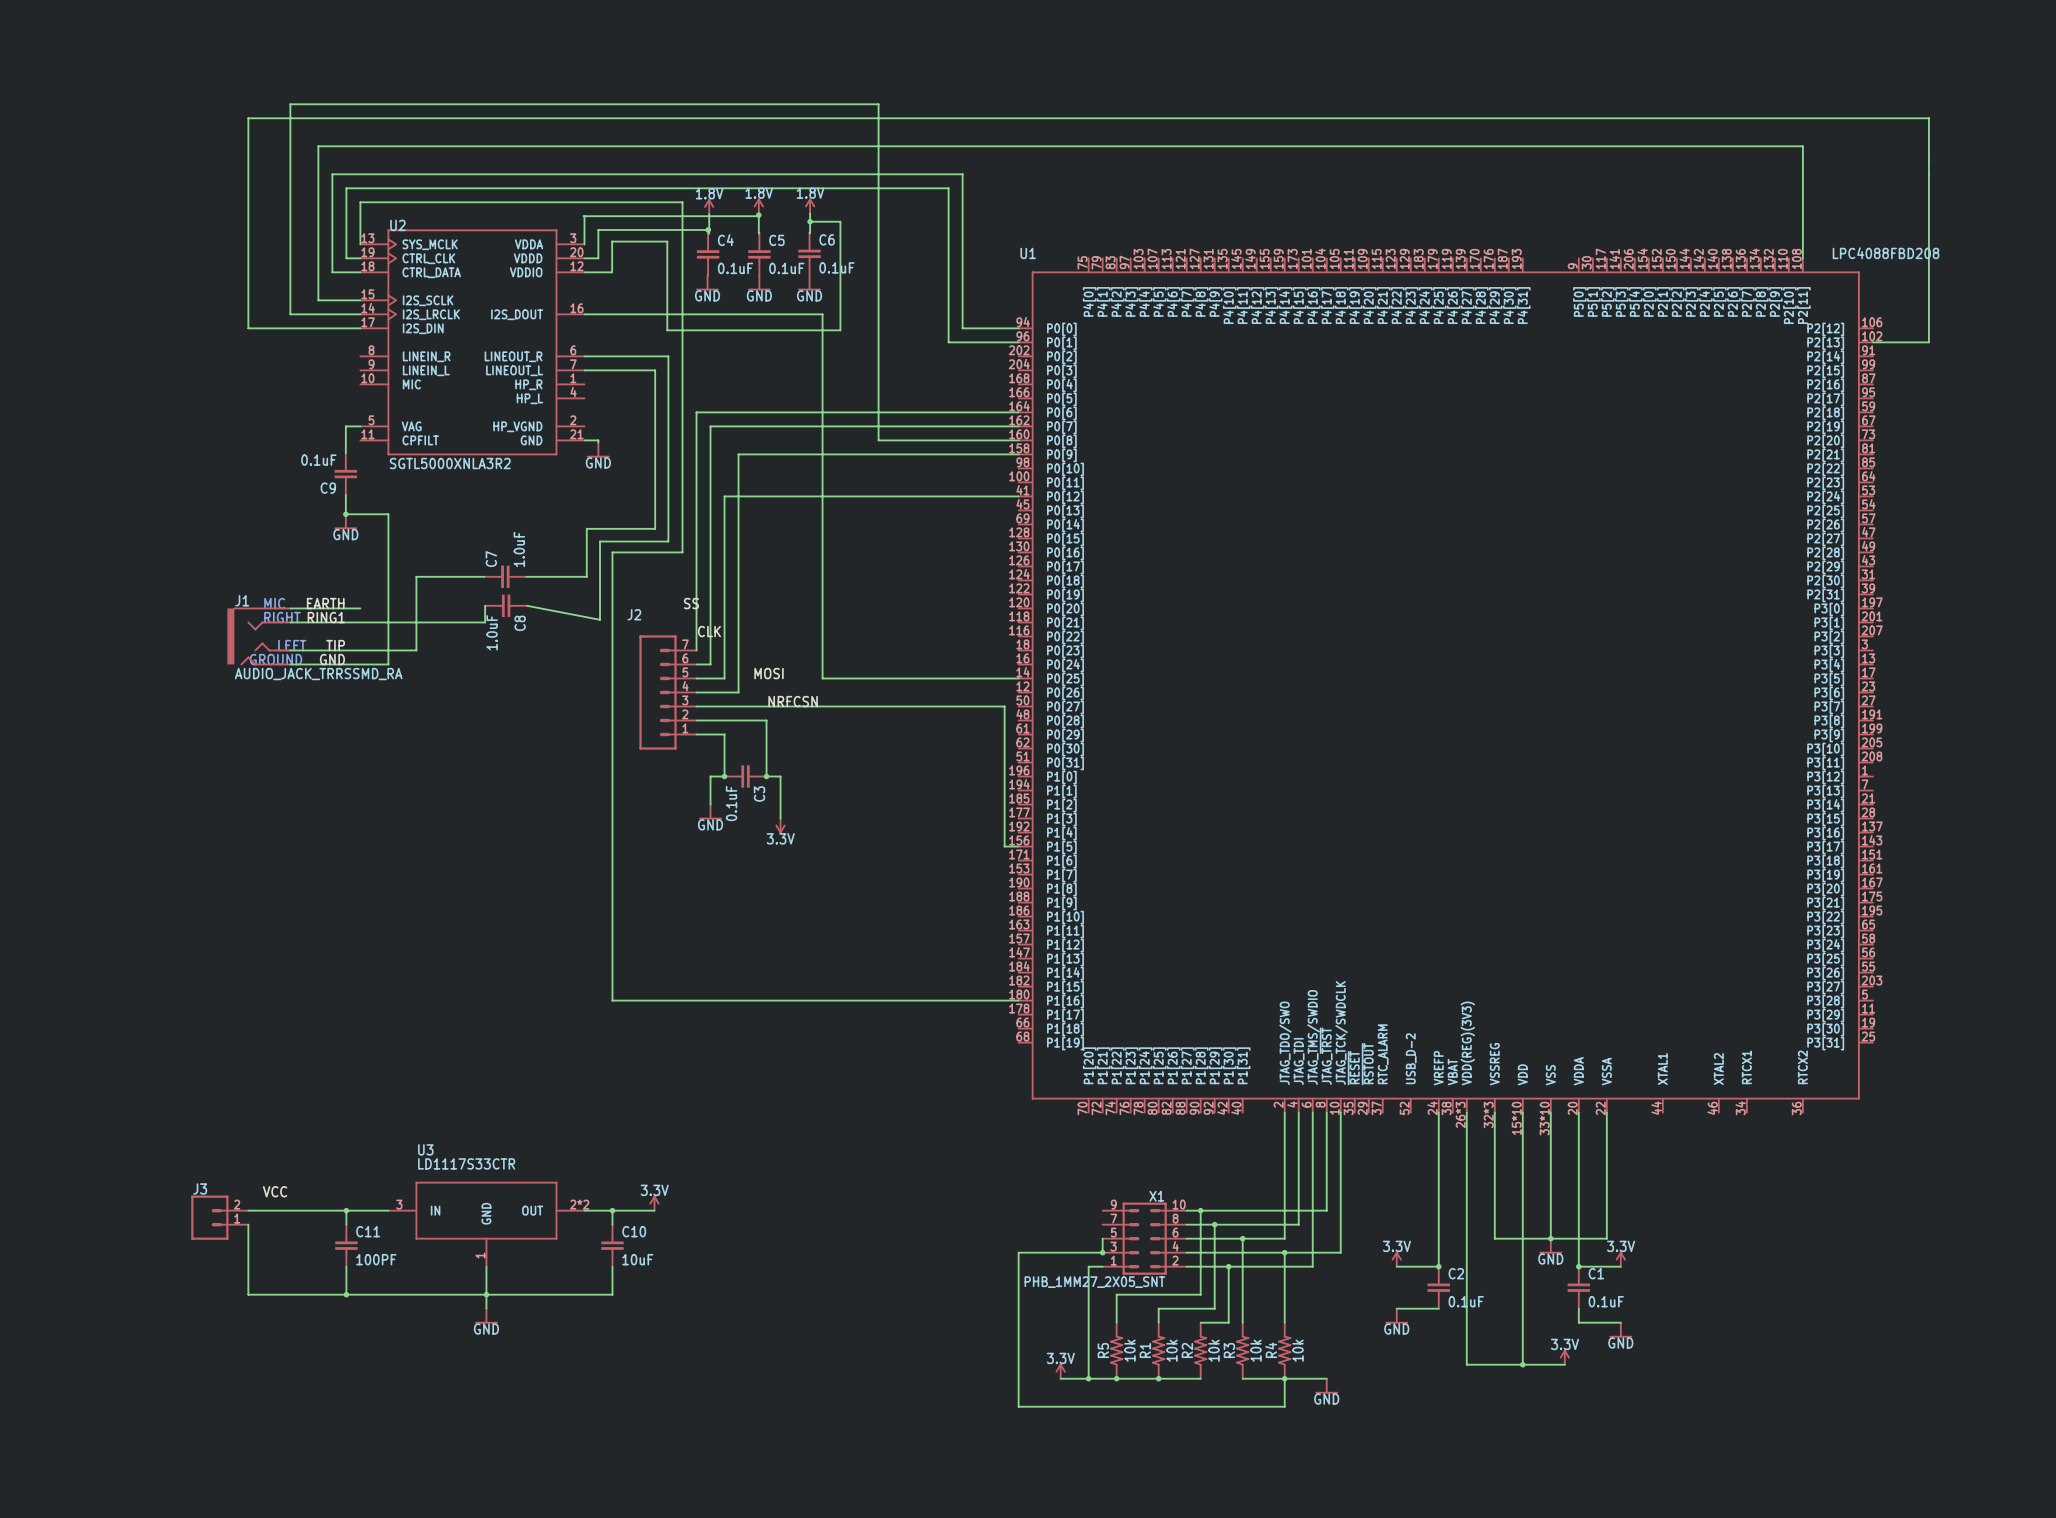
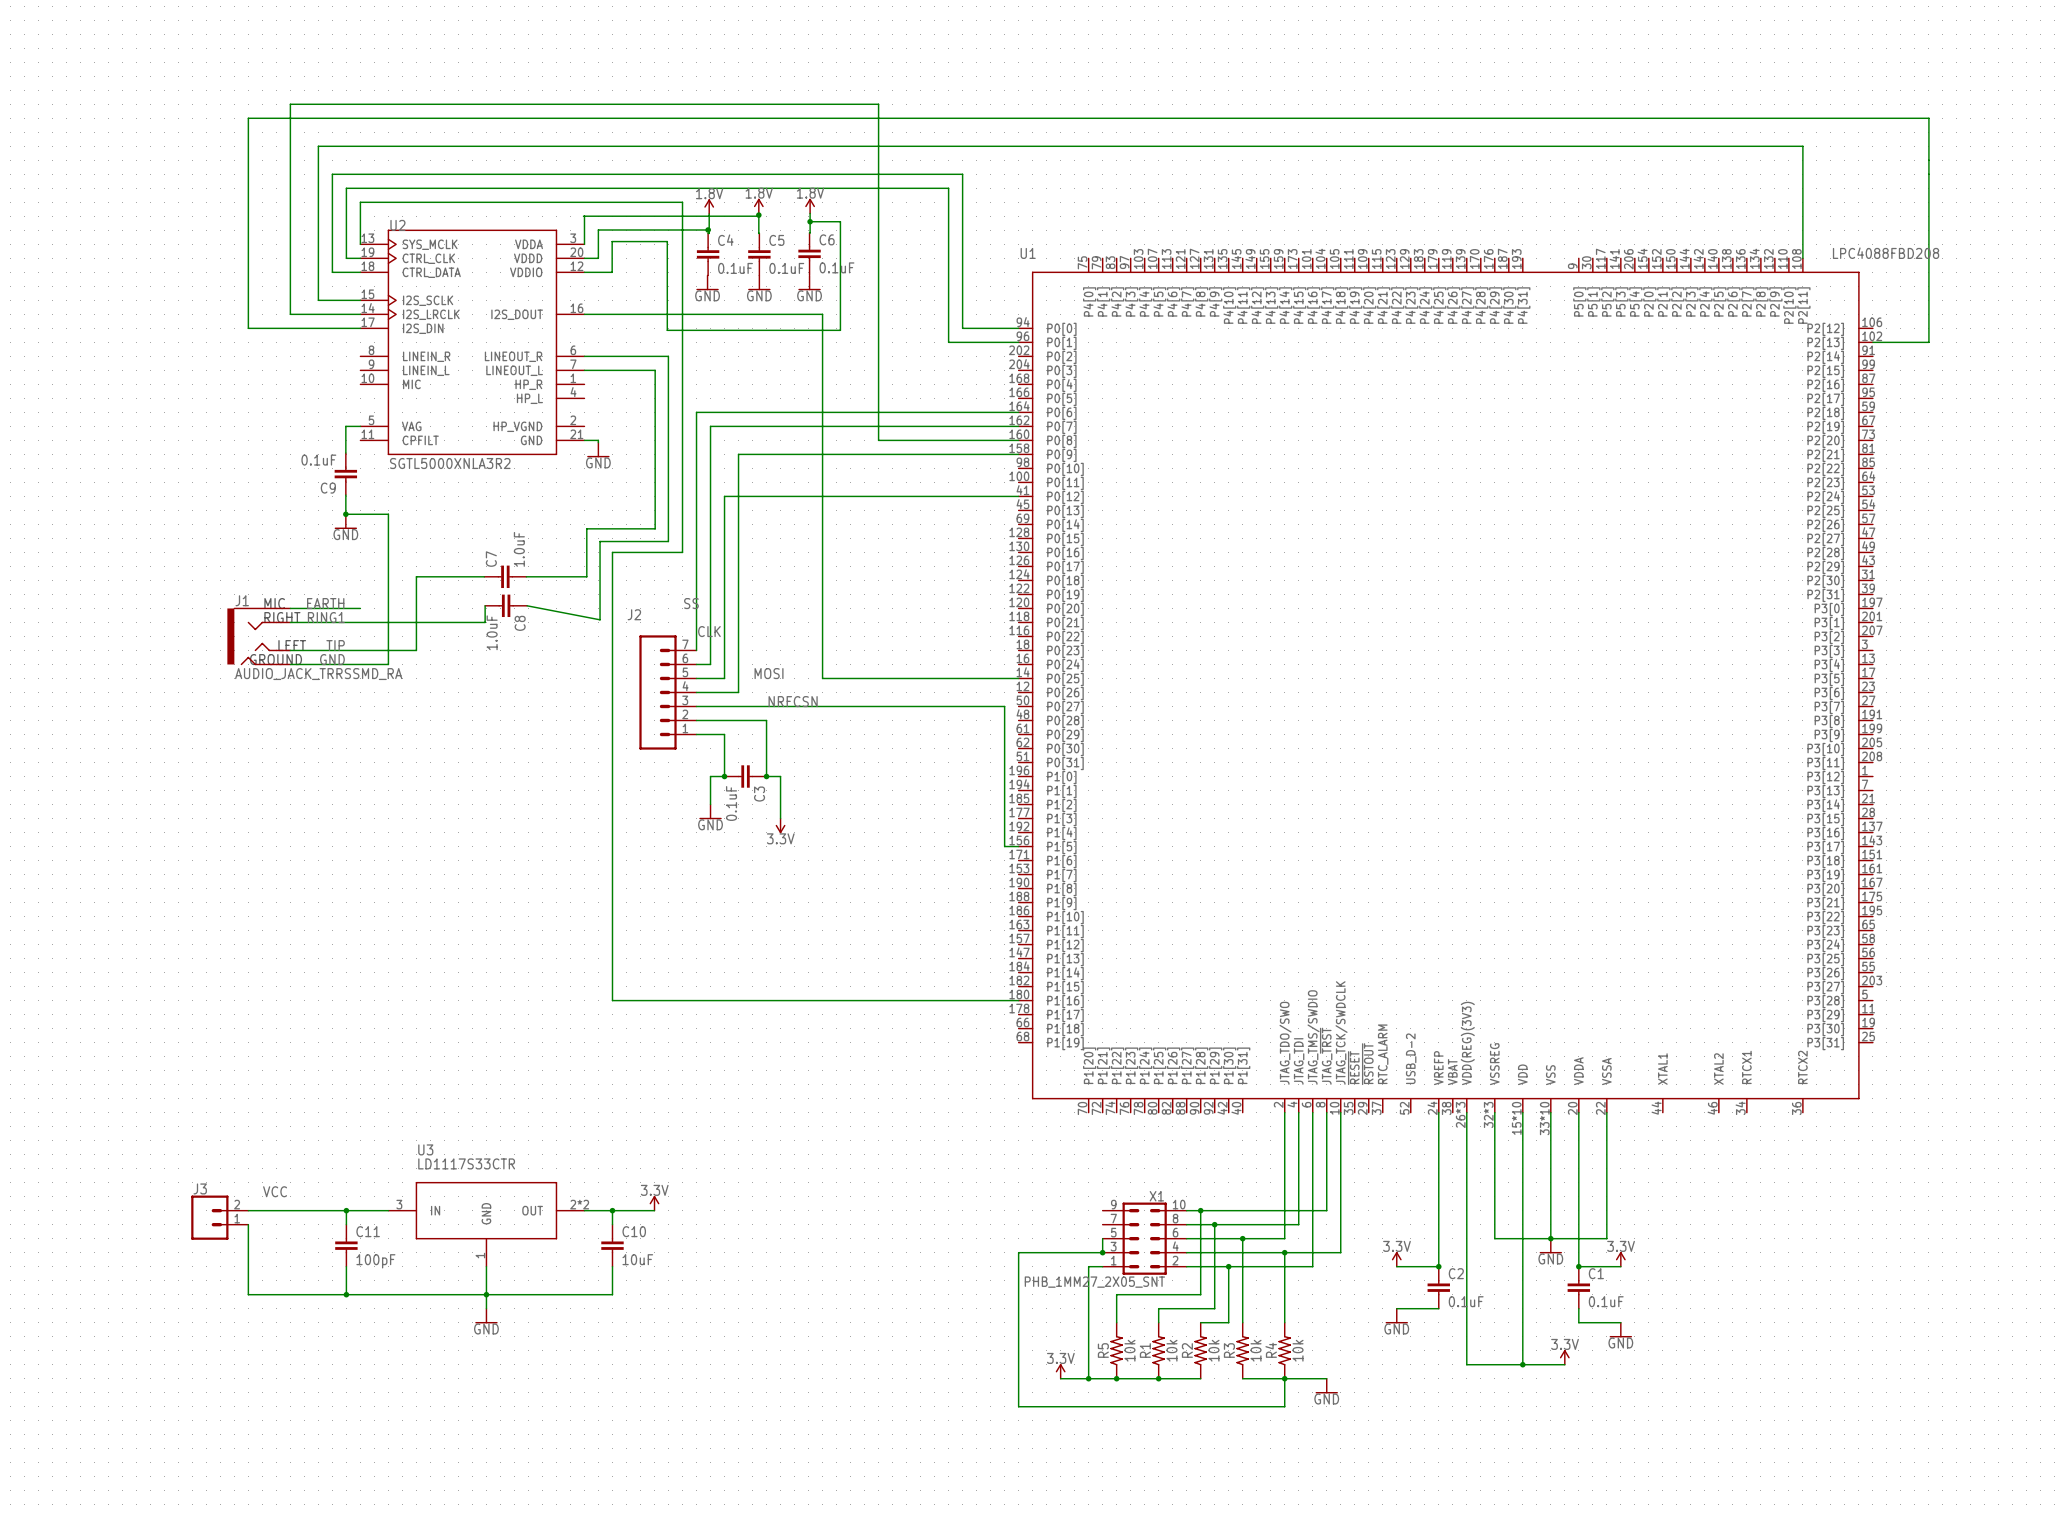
C11 value: 100PF (376, 1259) -> 100pF (375, 1261)

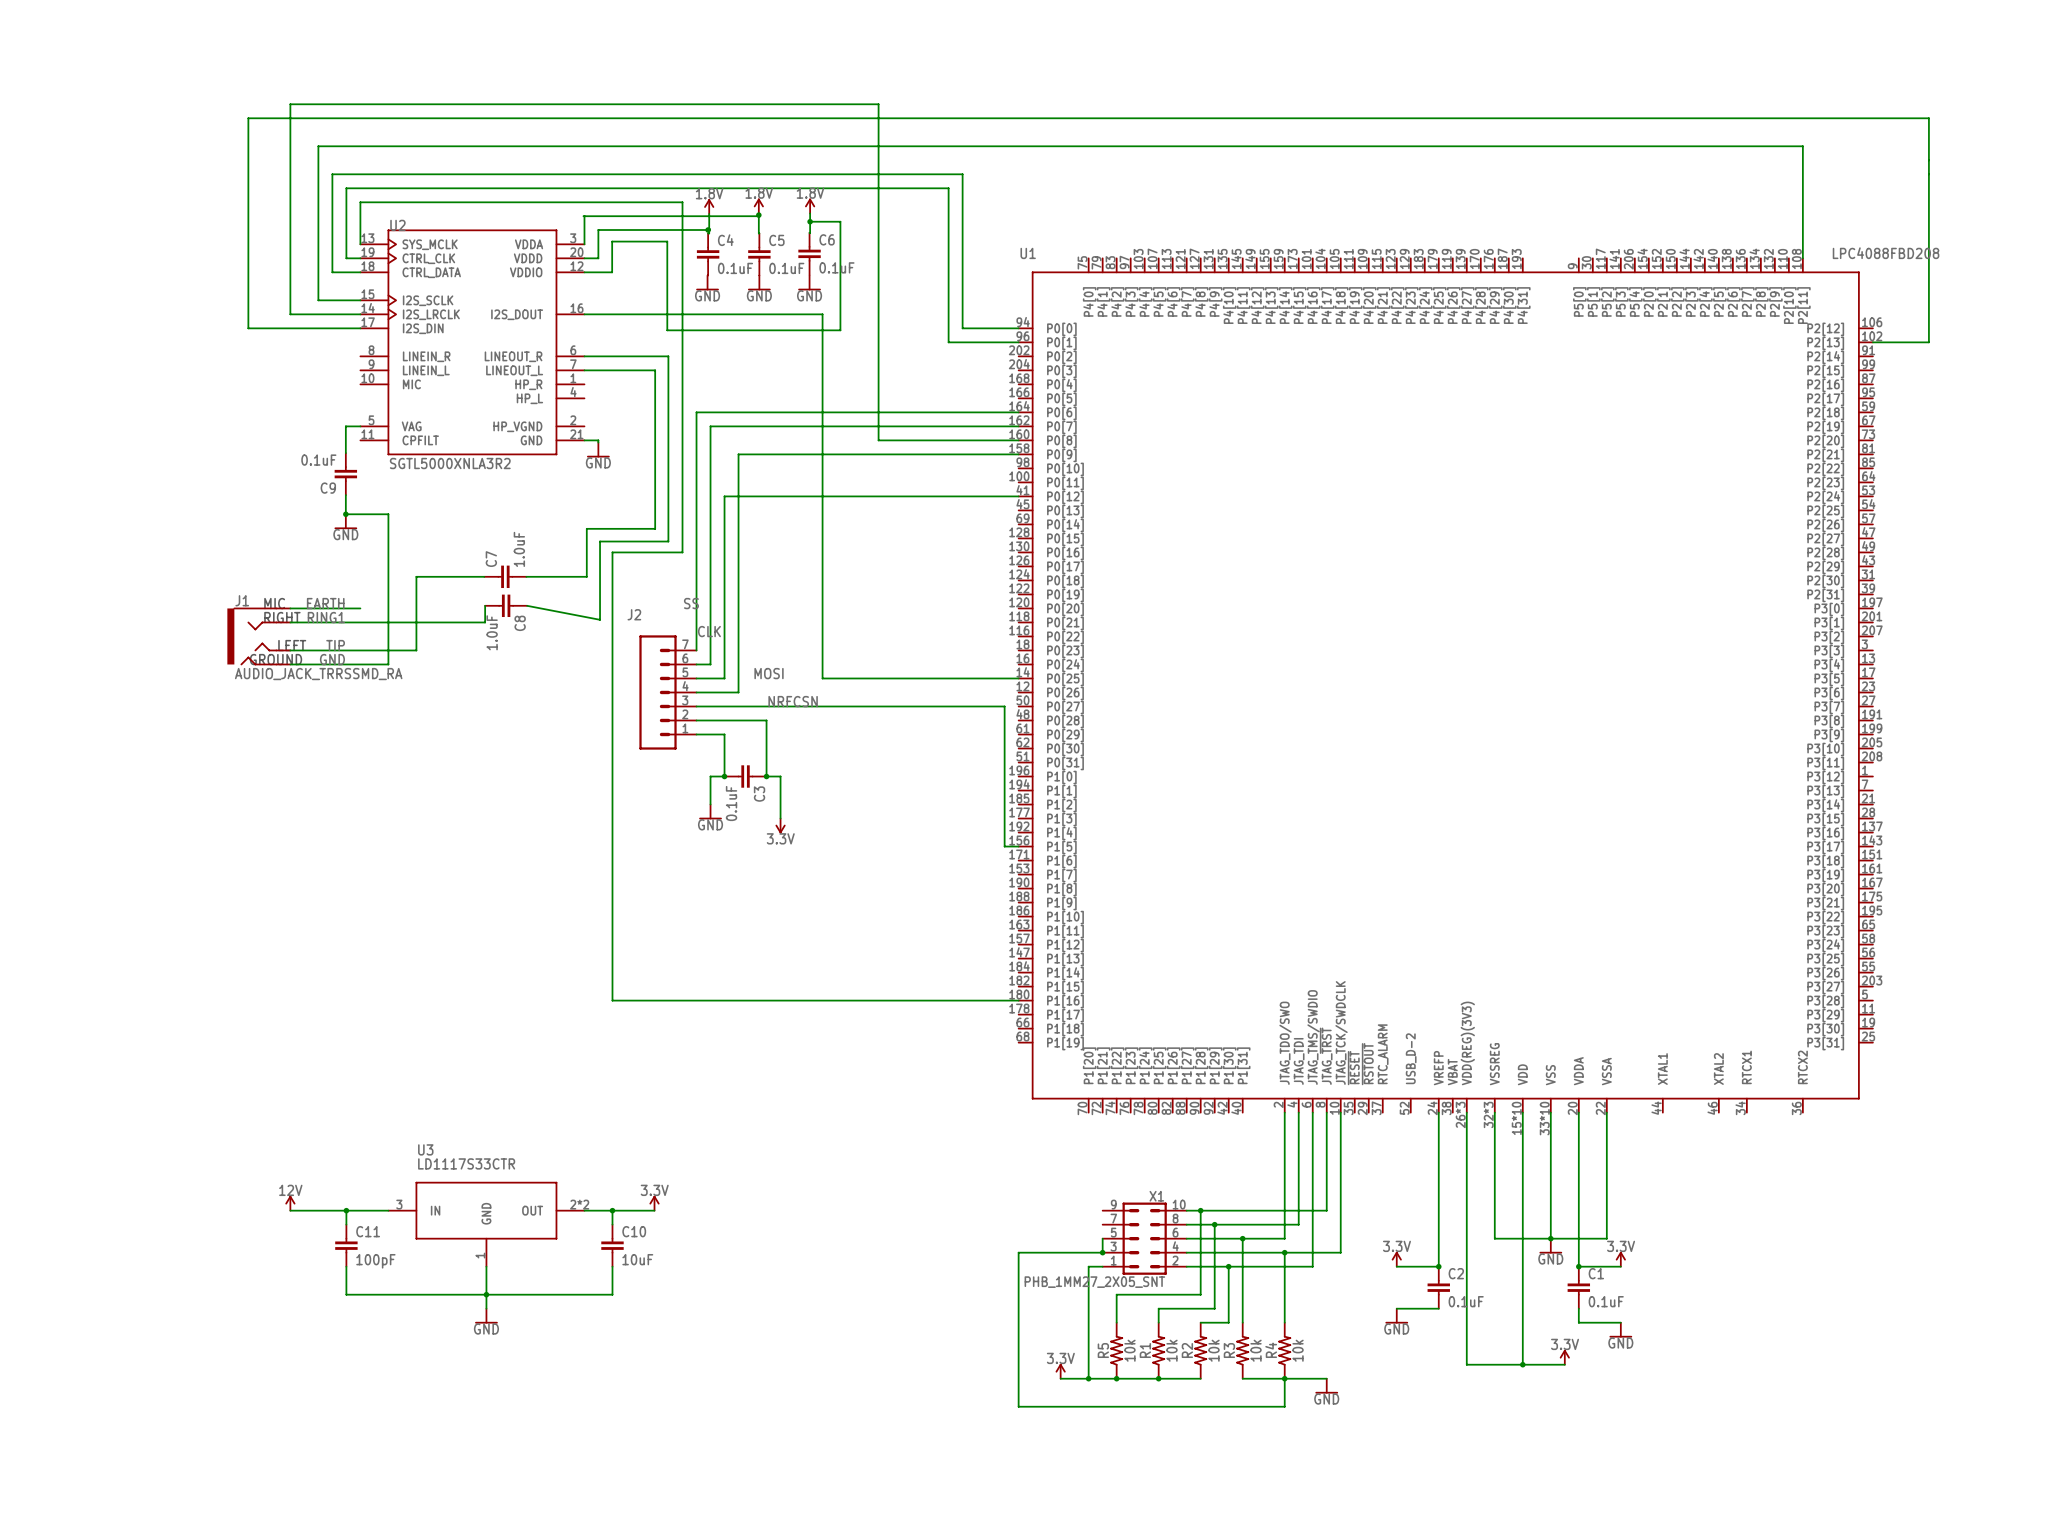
label: VCC (275, 1191) -> none
power symbol: none -> 12V (290, 1203)
wire: (248, 1210) (290, 1210) -> none
J3: (219, 1217) -> none
wire: (248, 1224) (248, 1294) (346, 1294) -> none
junction: (346, 1294) -> none

